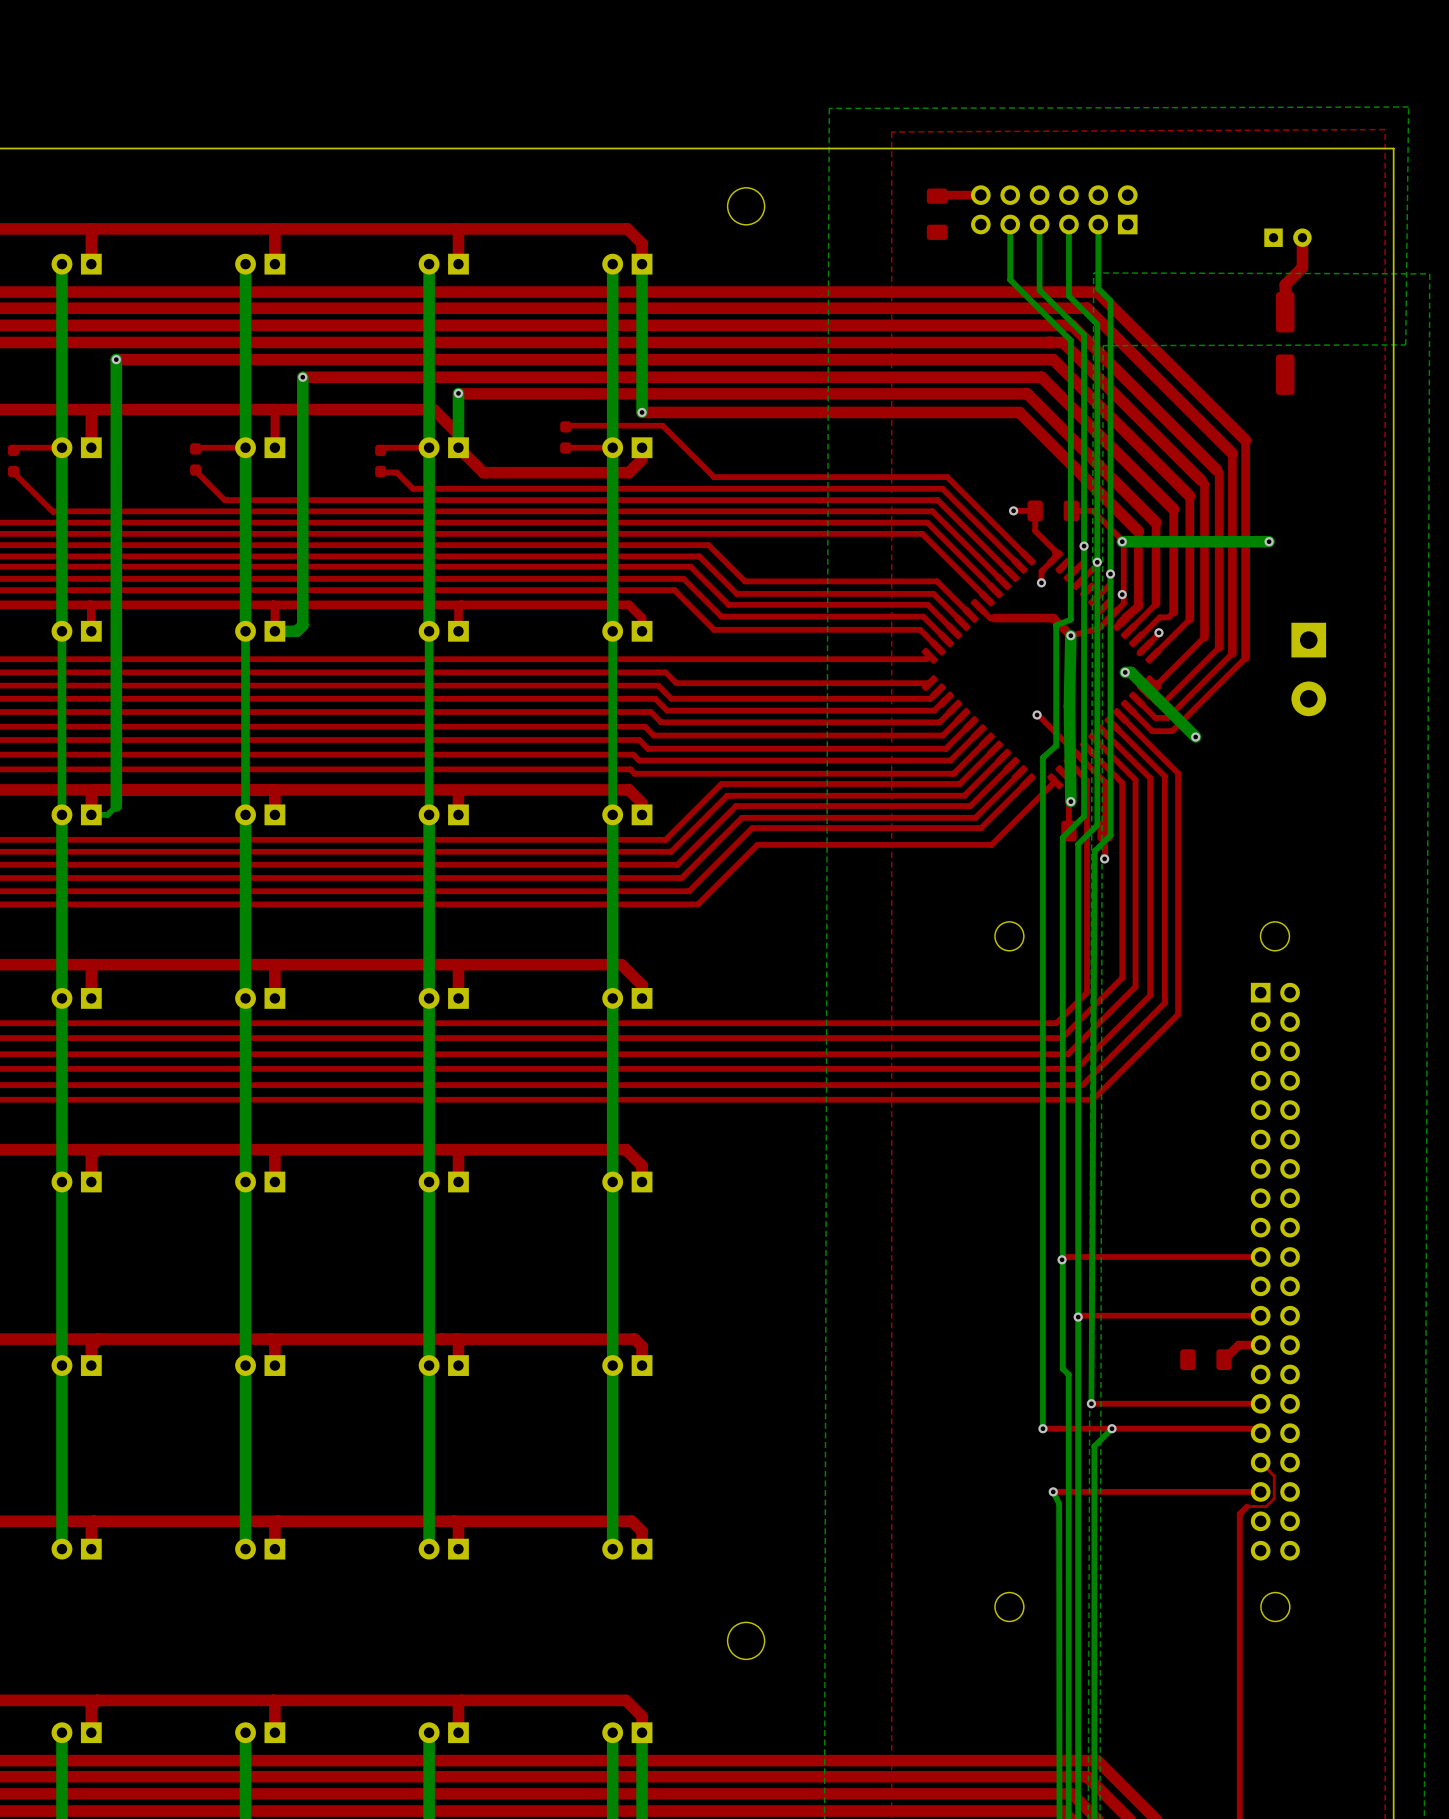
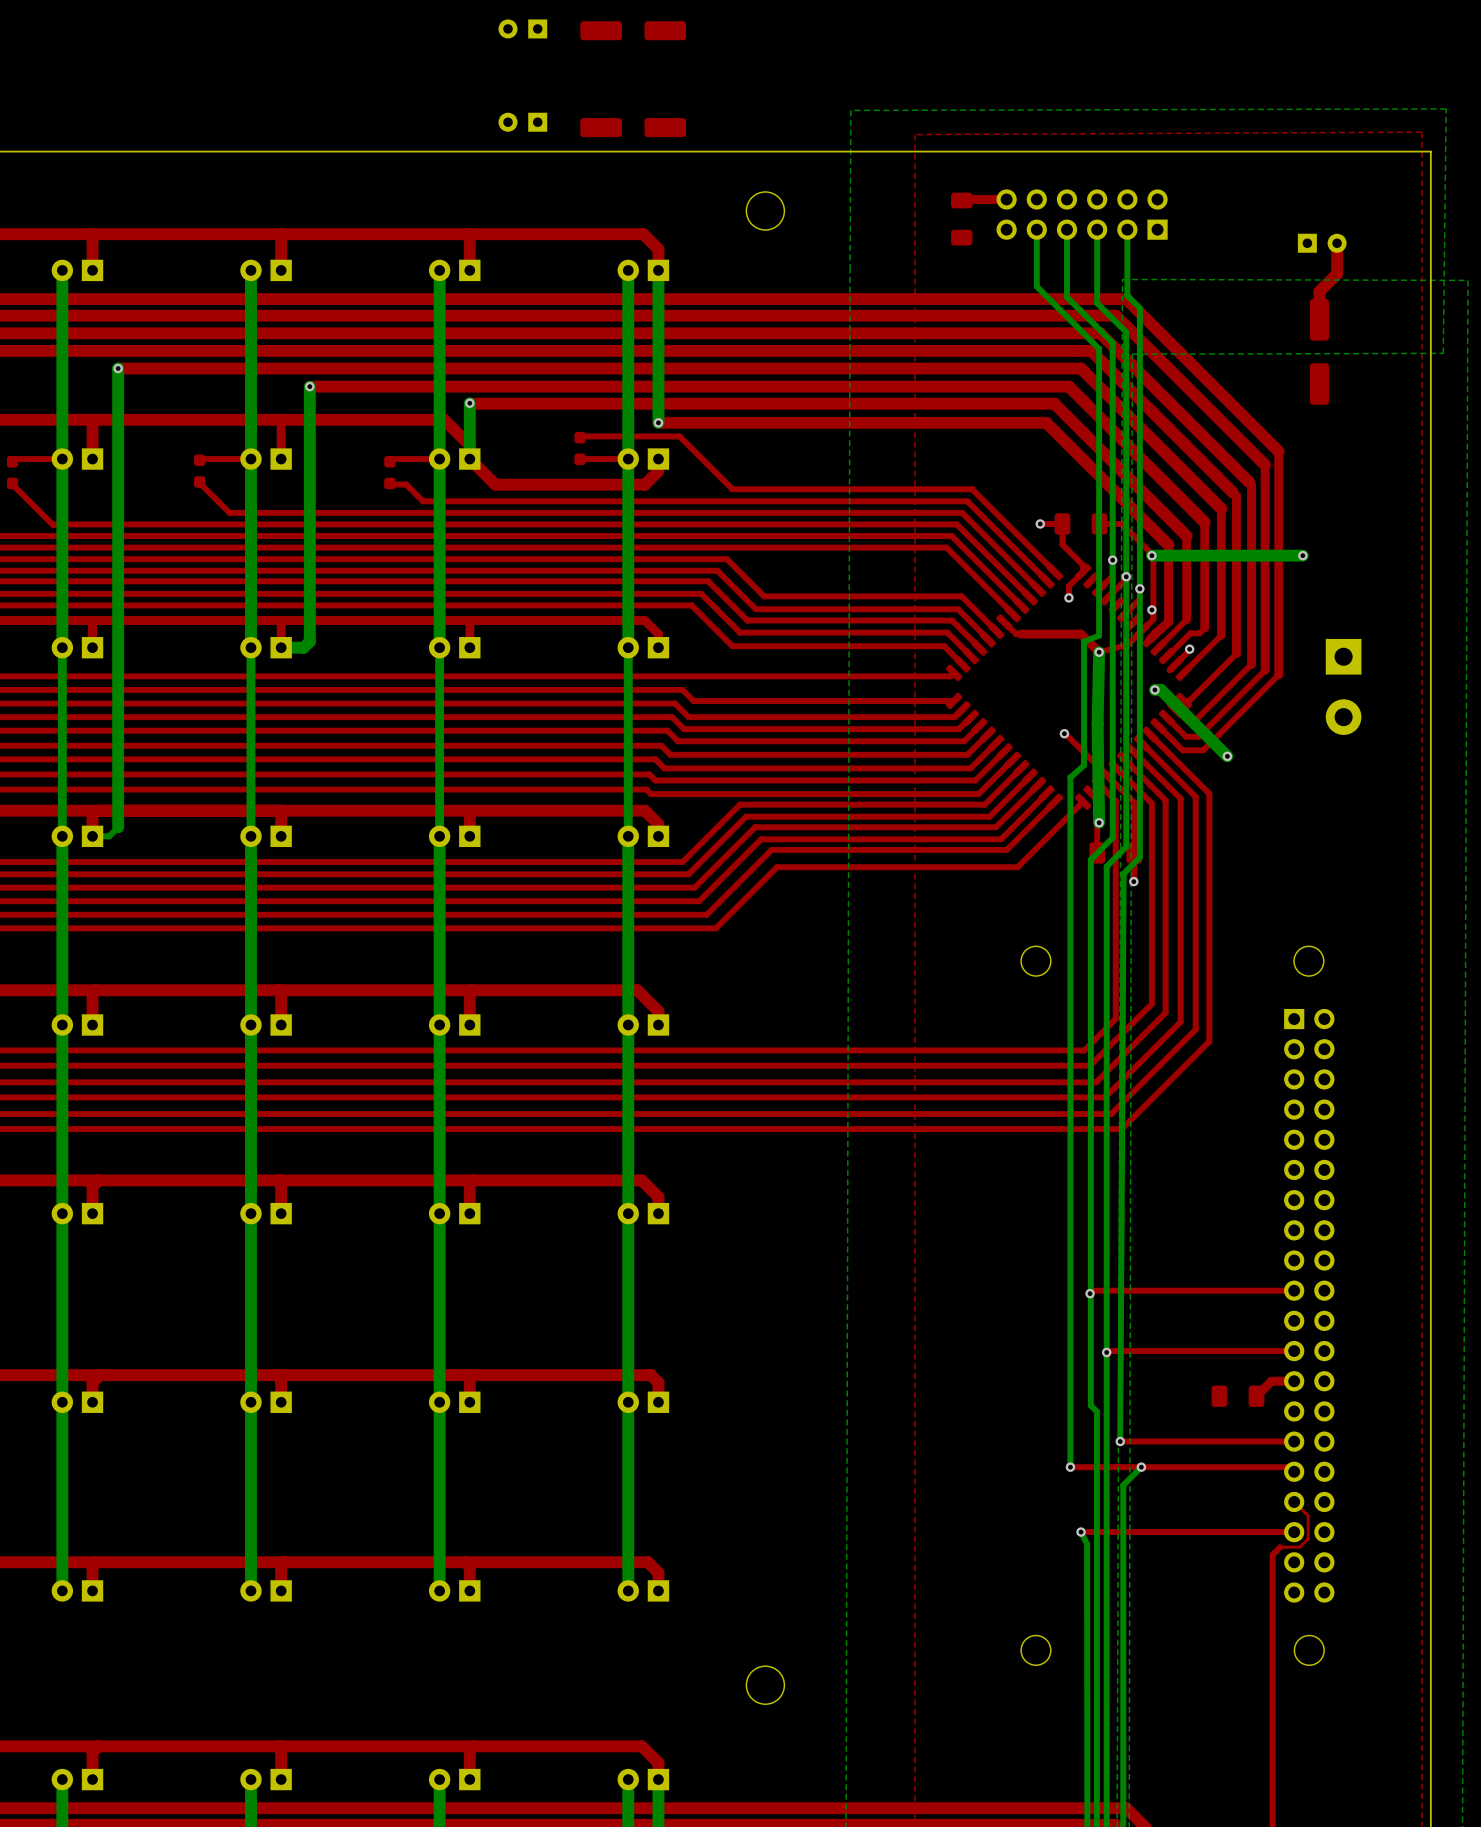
part: none -> (522, 28)
part: none -> (633, 30)
part: none -> (522, 122)
part: none -> (633, 127)

